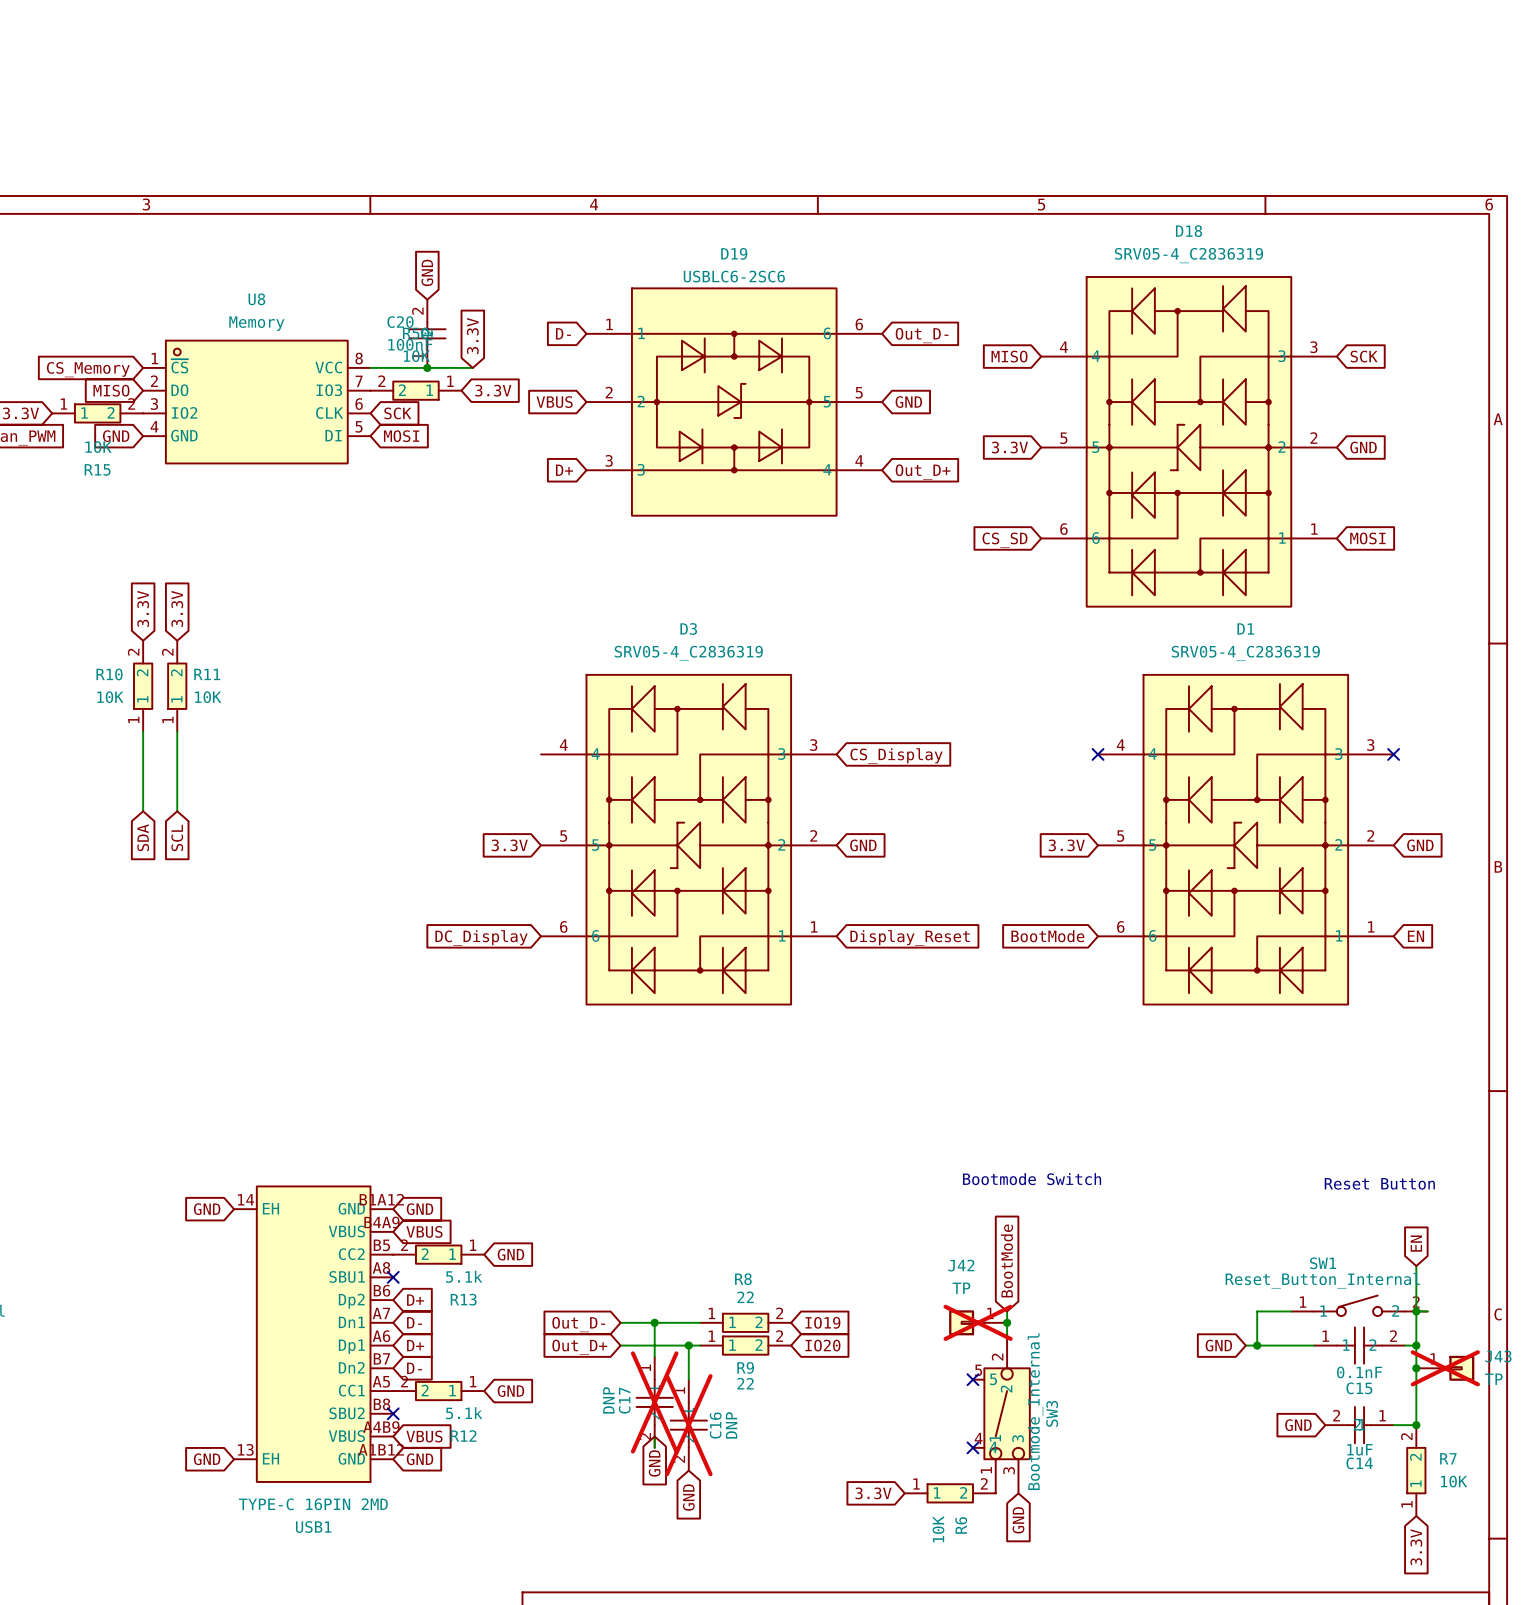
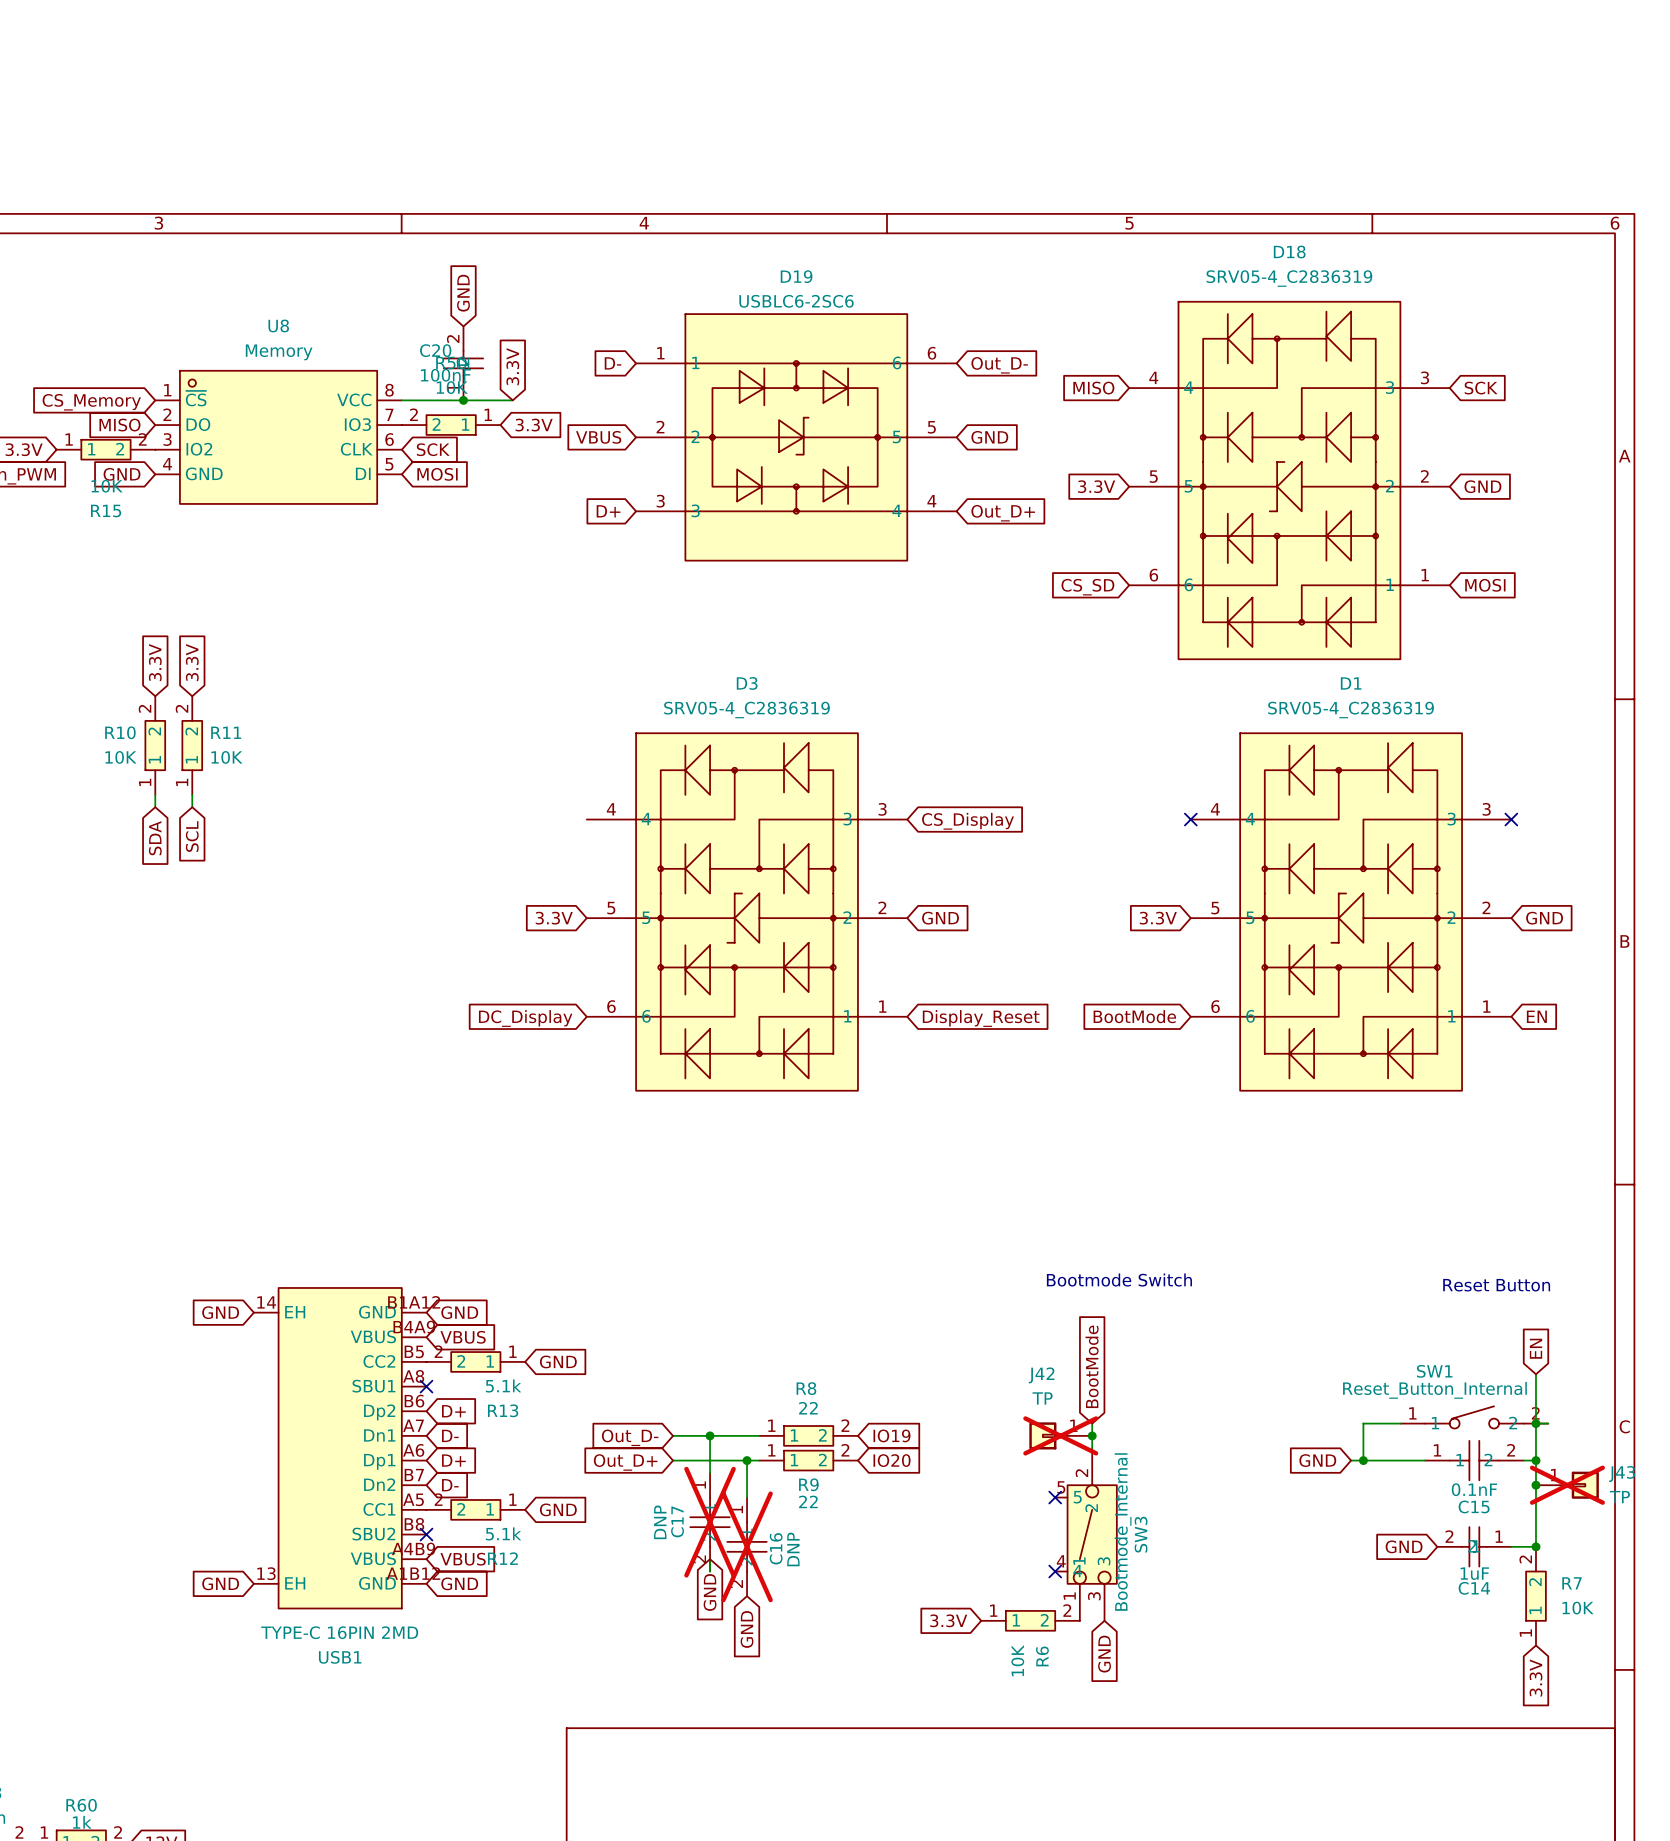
wire: (143, 743) (143, 811) -> none
wire: (177, 743) (177, 811) -> none
global label position: SDA (143, 837) -> SDA (155, 838)
global label position: SCL (177, 837) -> SCL (192, 836)

